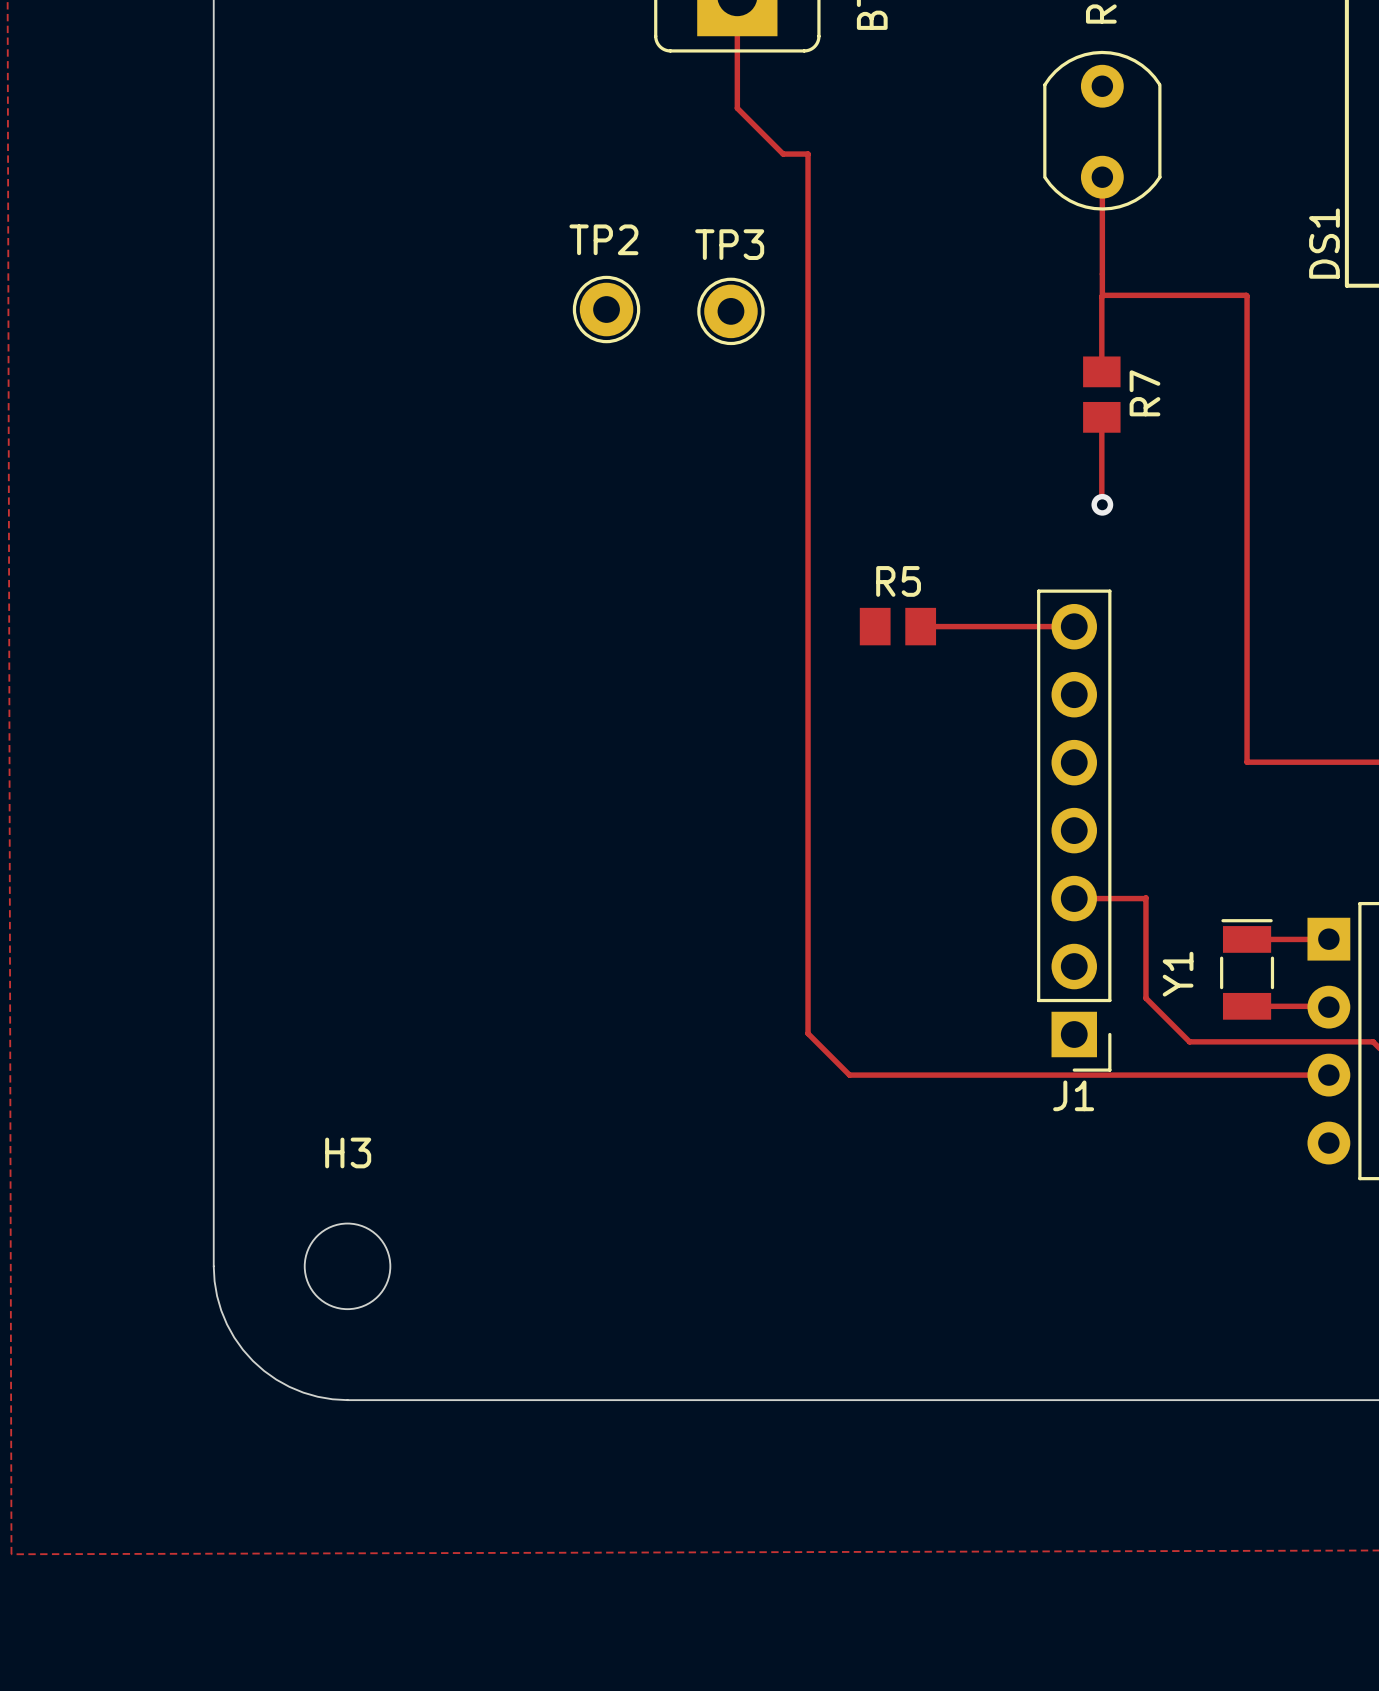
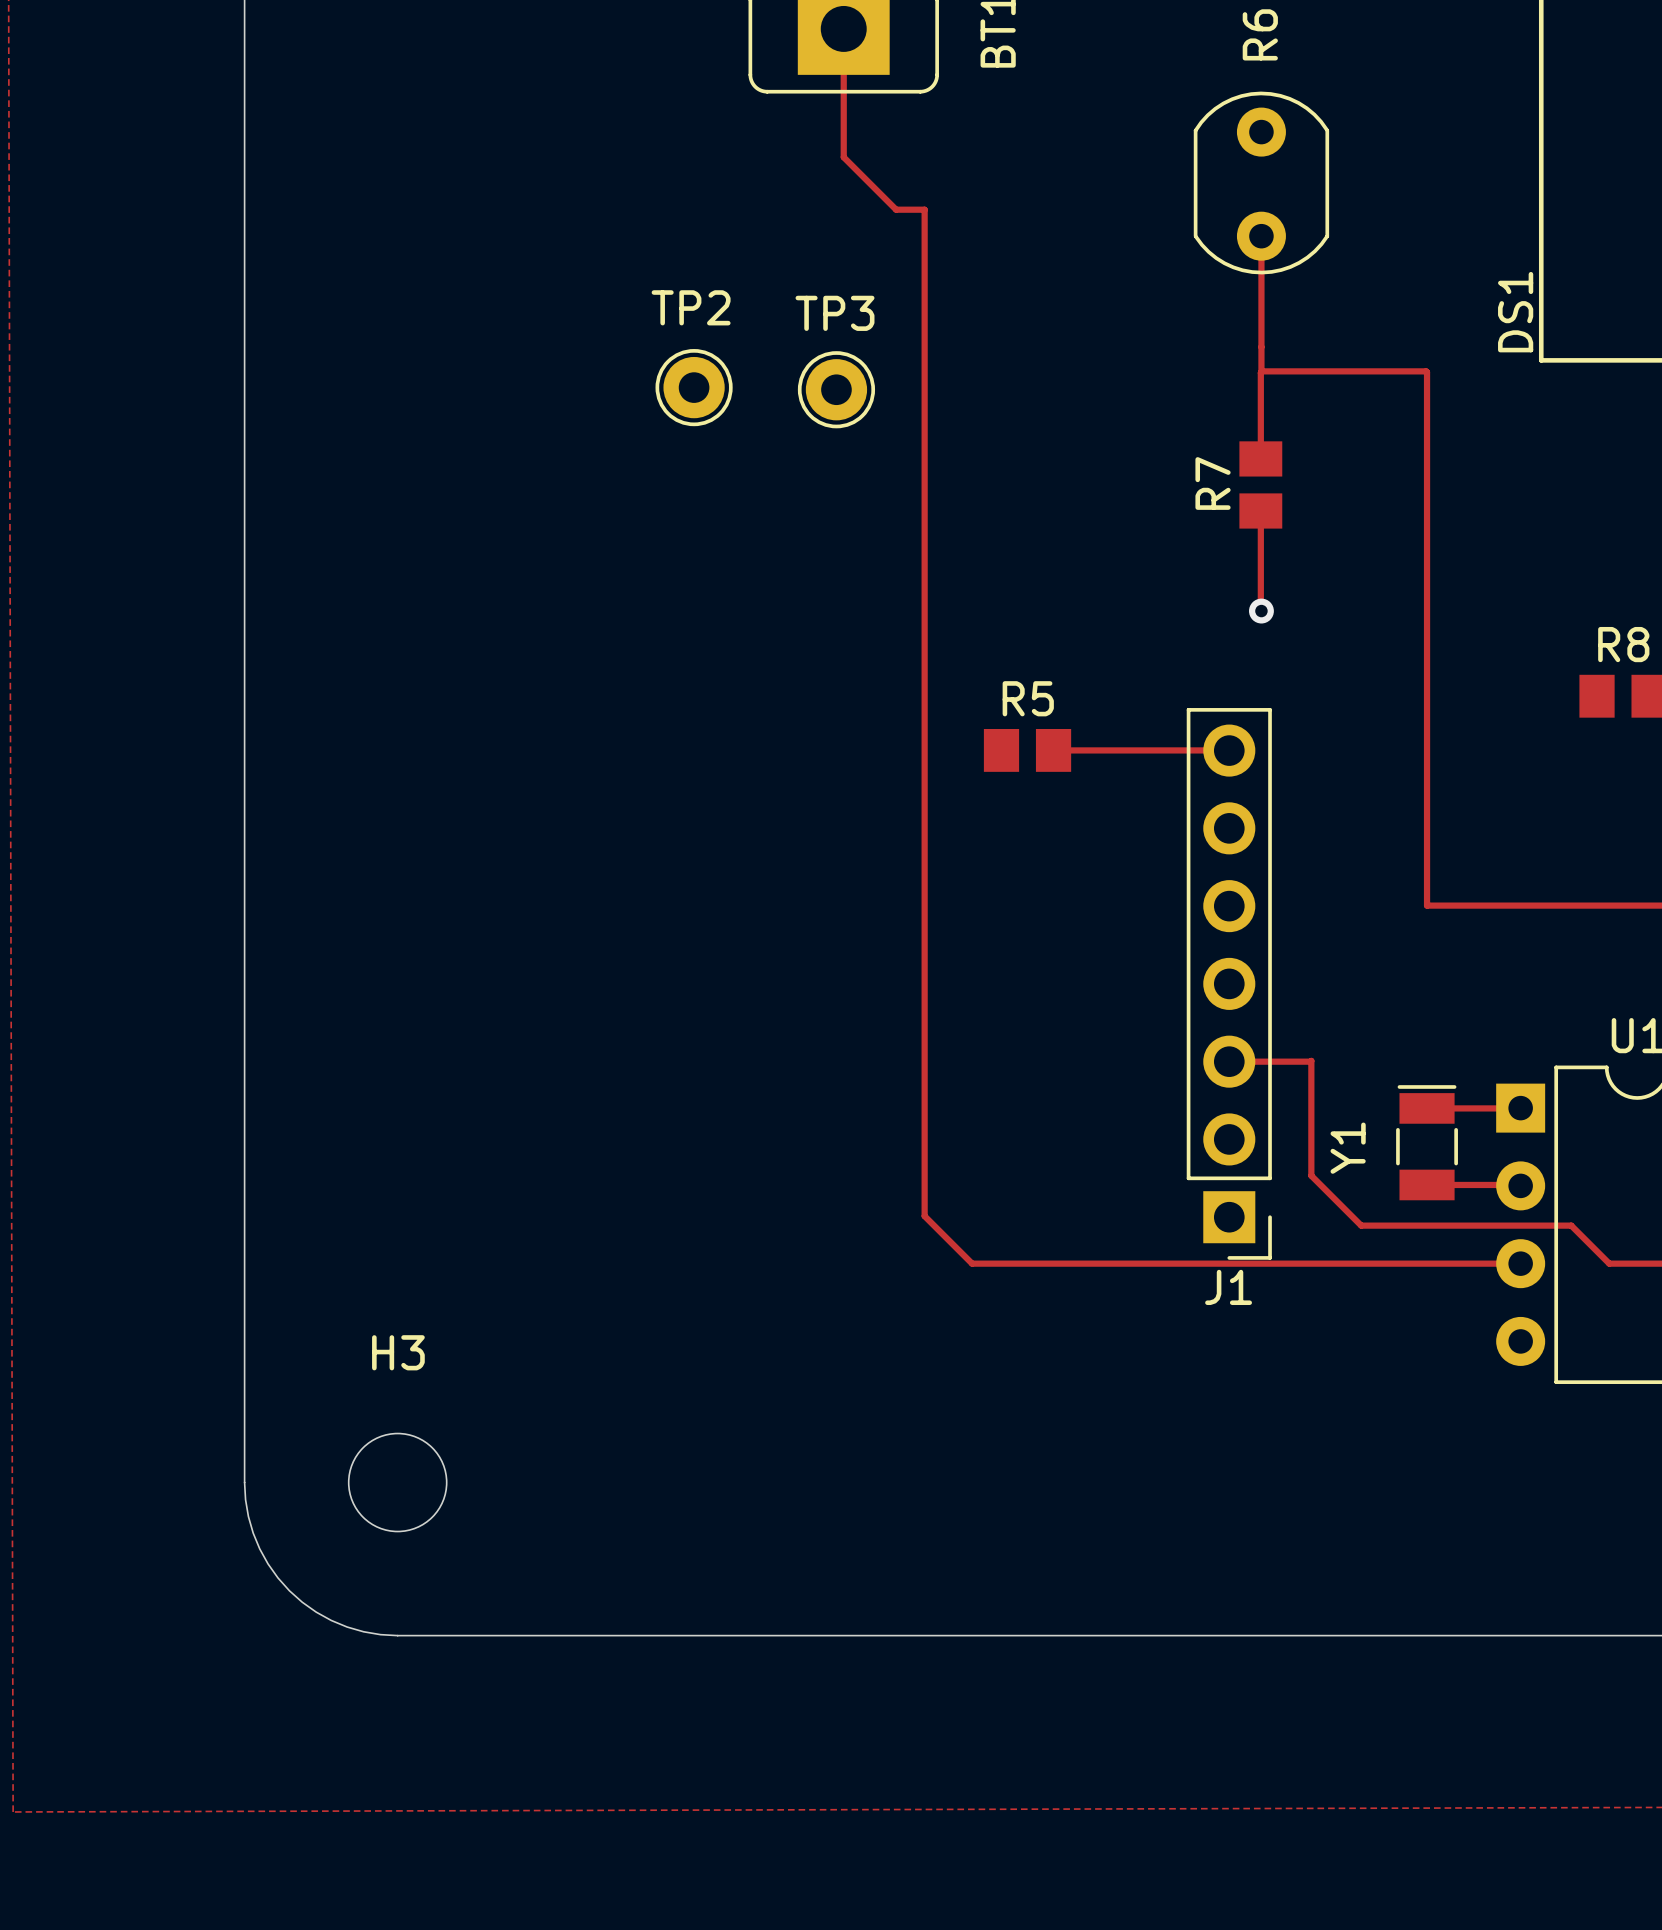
R7 name position: R7 (1144, 393) -> R7 (1213, 483)

